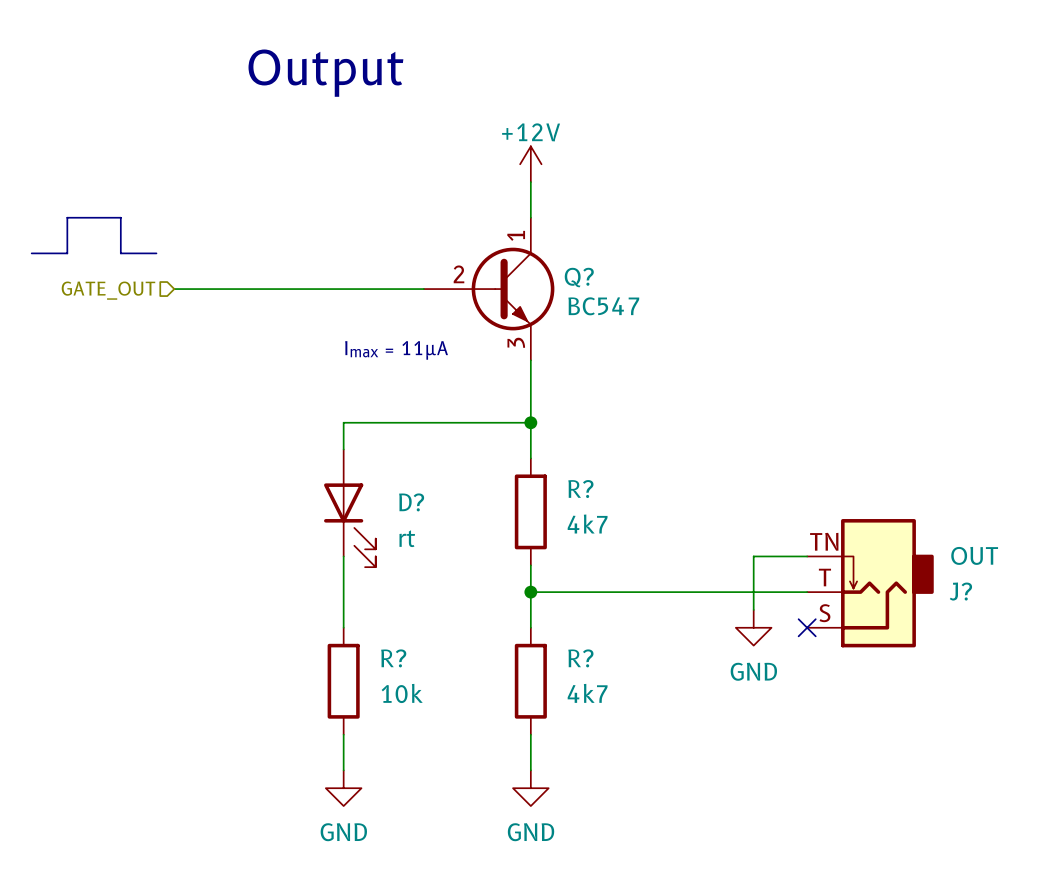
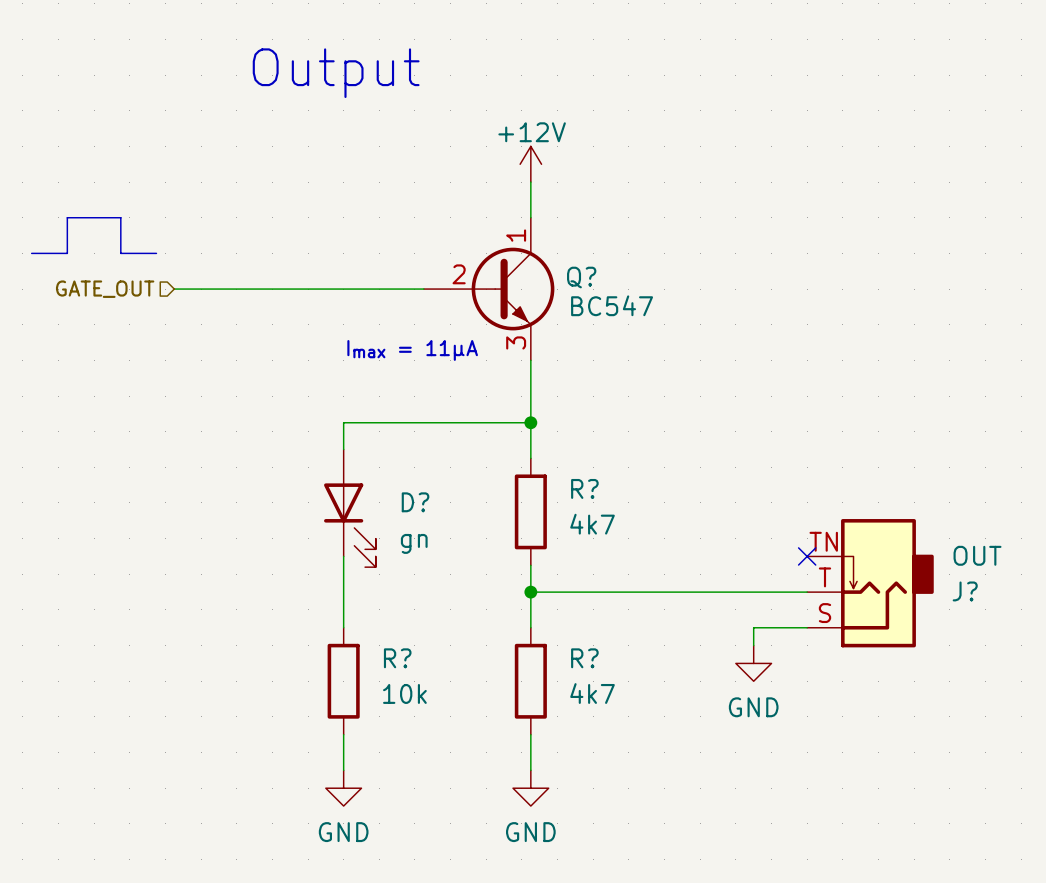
D? value: rt (407, 538) -> gn (414, 543)
wire: (807, 556) (753, 556) (753, 609) -> none
power symbol position: GND (753, 627) -> GND (753, 663)
wire: none -> (807, 627) (753, 627) (753, 645)
no-connect mark position: (807, 627) -> (807, 556)

